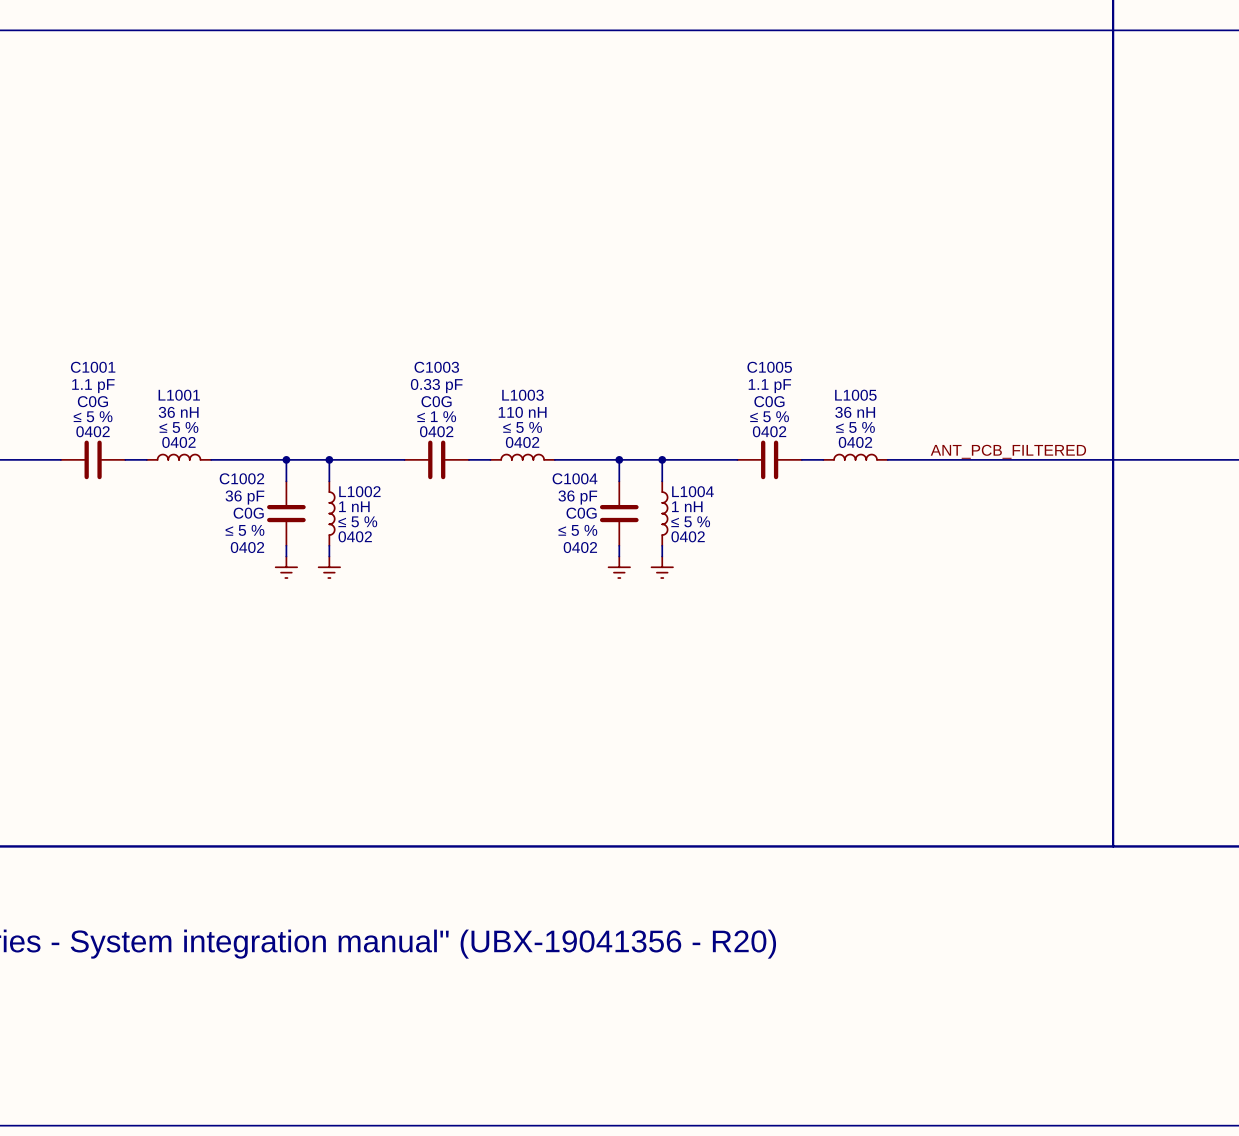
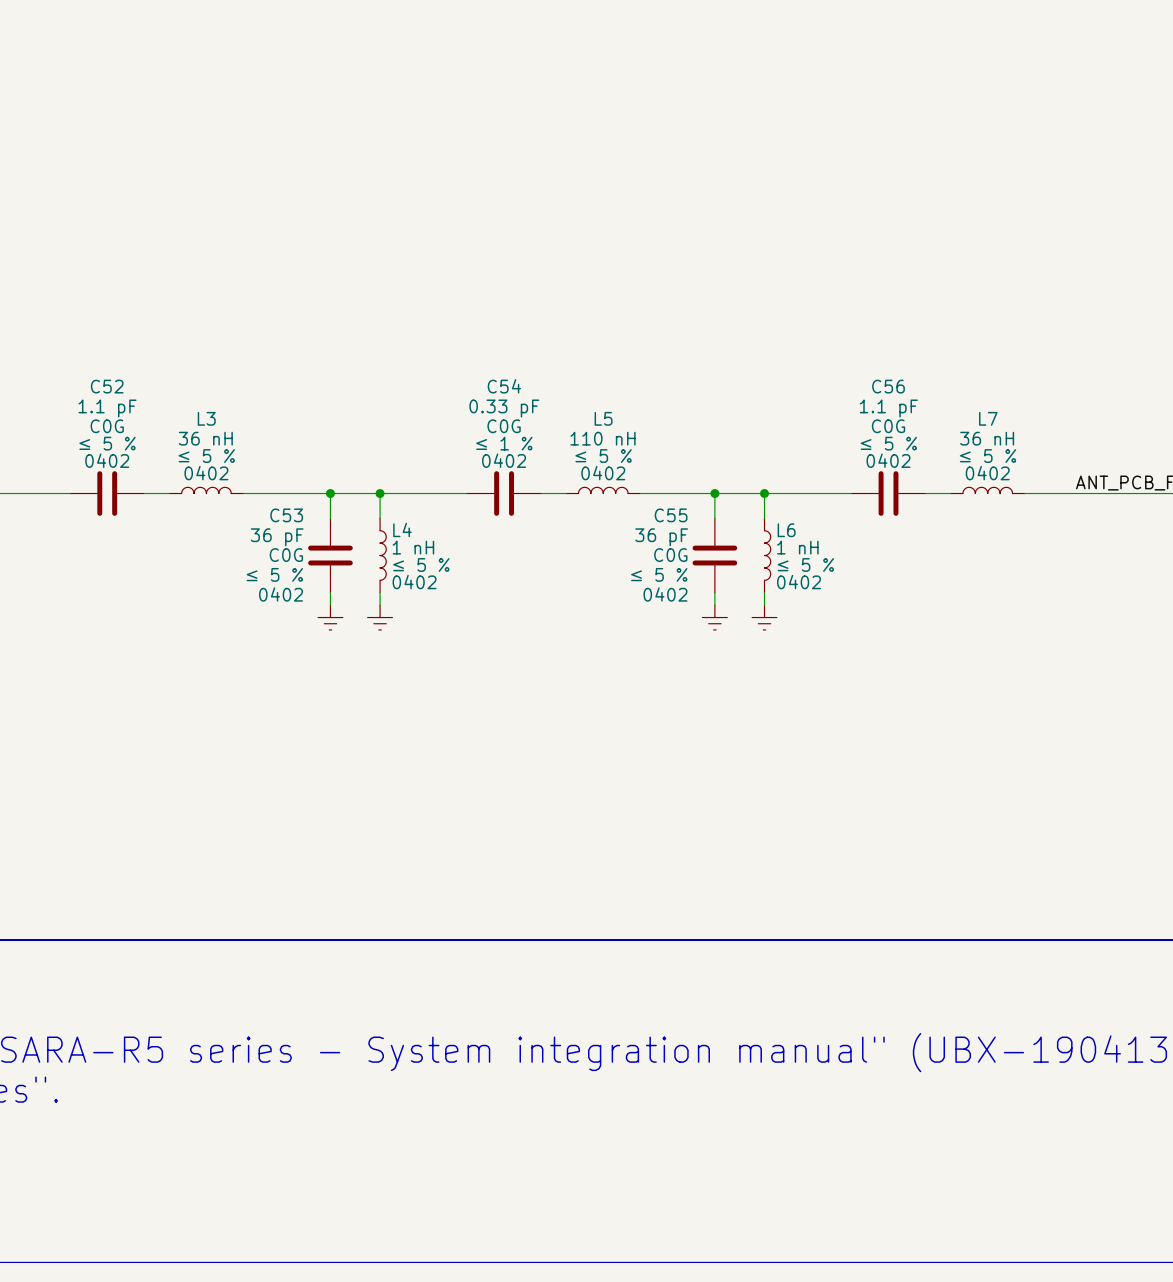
C1001 name: C1001 (93, 367) -> C52 (107, 386)
C1003 name: C1003 (436, 367) -> C54 (504, 386)
C1005 name: C1005 (769, 367) -> C56 (888, 386)
L1001 name: L1001 (179, 395) -> L3 (206, 418)
L1003 name: L1003 (522, 395) -> L5 (603, 418)
L1005 name: L1005 (855, 395) -> L7 (988, 418)
C1002 name: C1002 (241, 478) -> C53 (286, 515)
C1004 name: C1004 (574, 478) -> C55 (671, 515)
L1002 name: L1002 (359, 491) -> L4 (402, 529)
L1004 name: L1004 (692, 491) -> L6 (786, 530)

